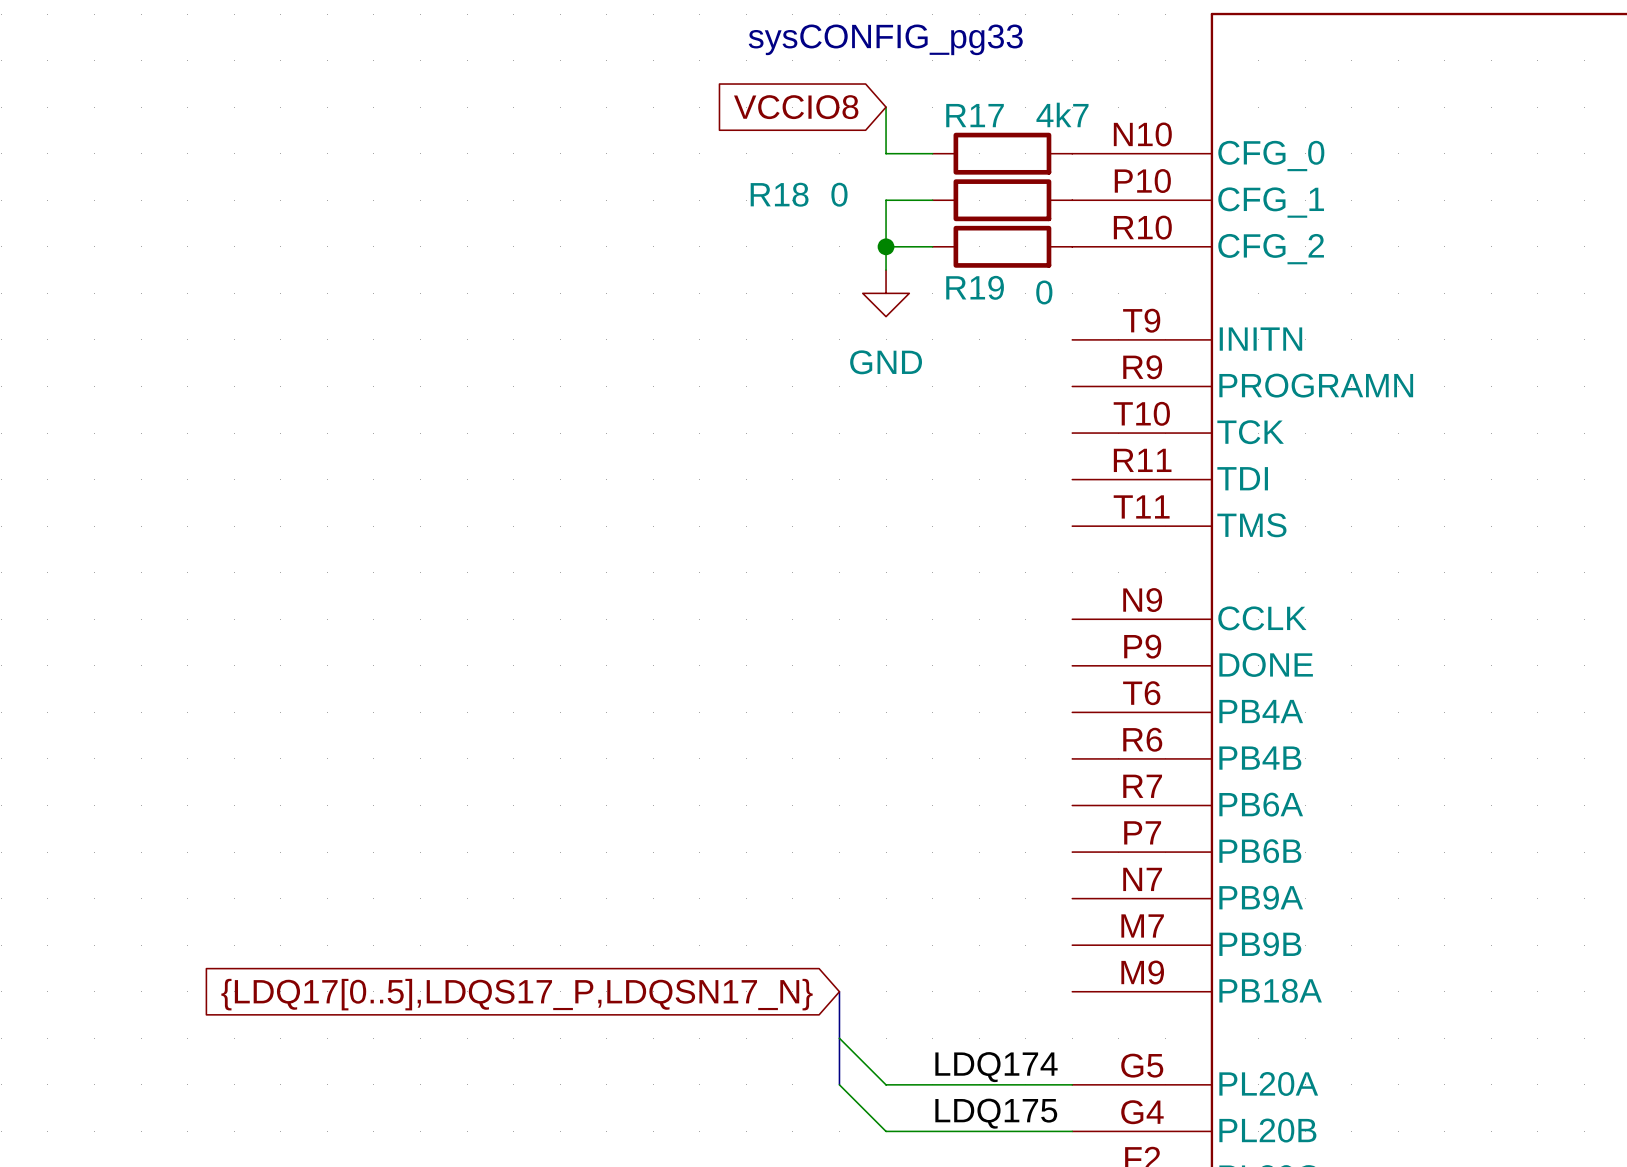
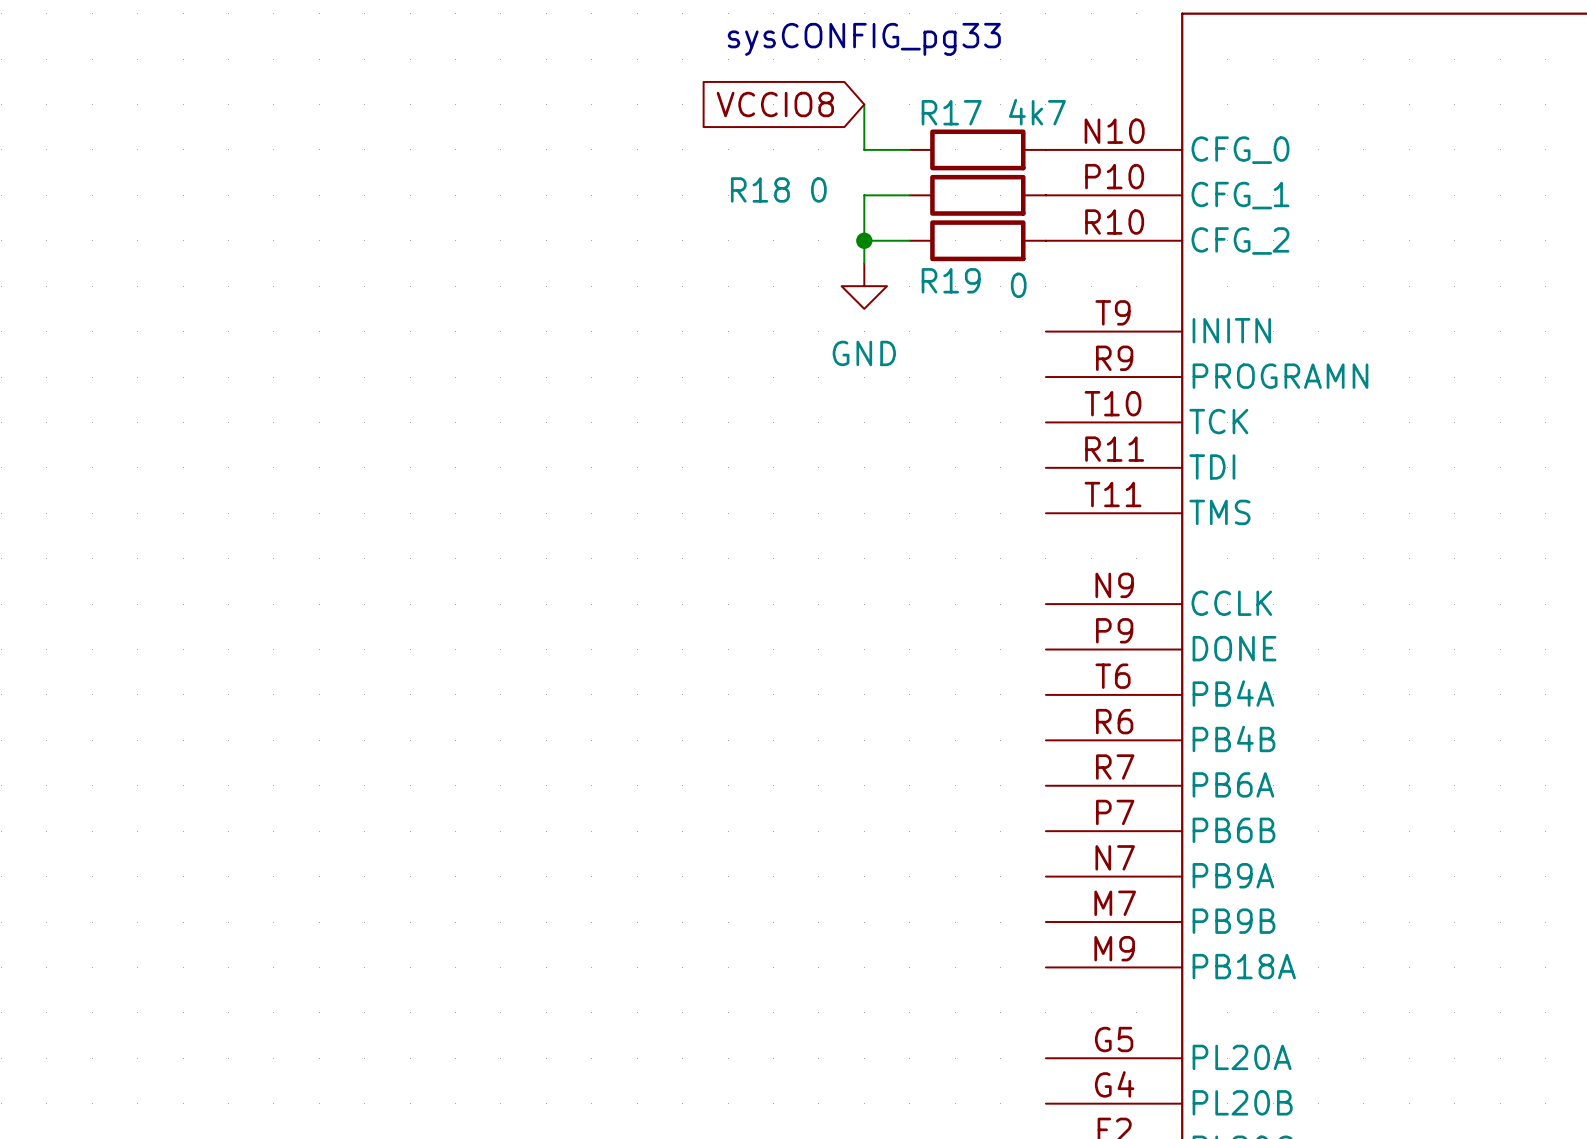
bus: (839, 991) (839, 1084) -> none
global label: {LDQ17[0..5],LDQS17_P,LDQSN17_N} (517, 994) -> none
wire: (839, 1038) (886, 1084) (1072, 1084) -> none
label: LDQ174 (996, 1067) -> none
wire: (839, 1084) (886, 1131) (1072, 1131) -> none
label: LDQ175 (996, 1113) -> none

